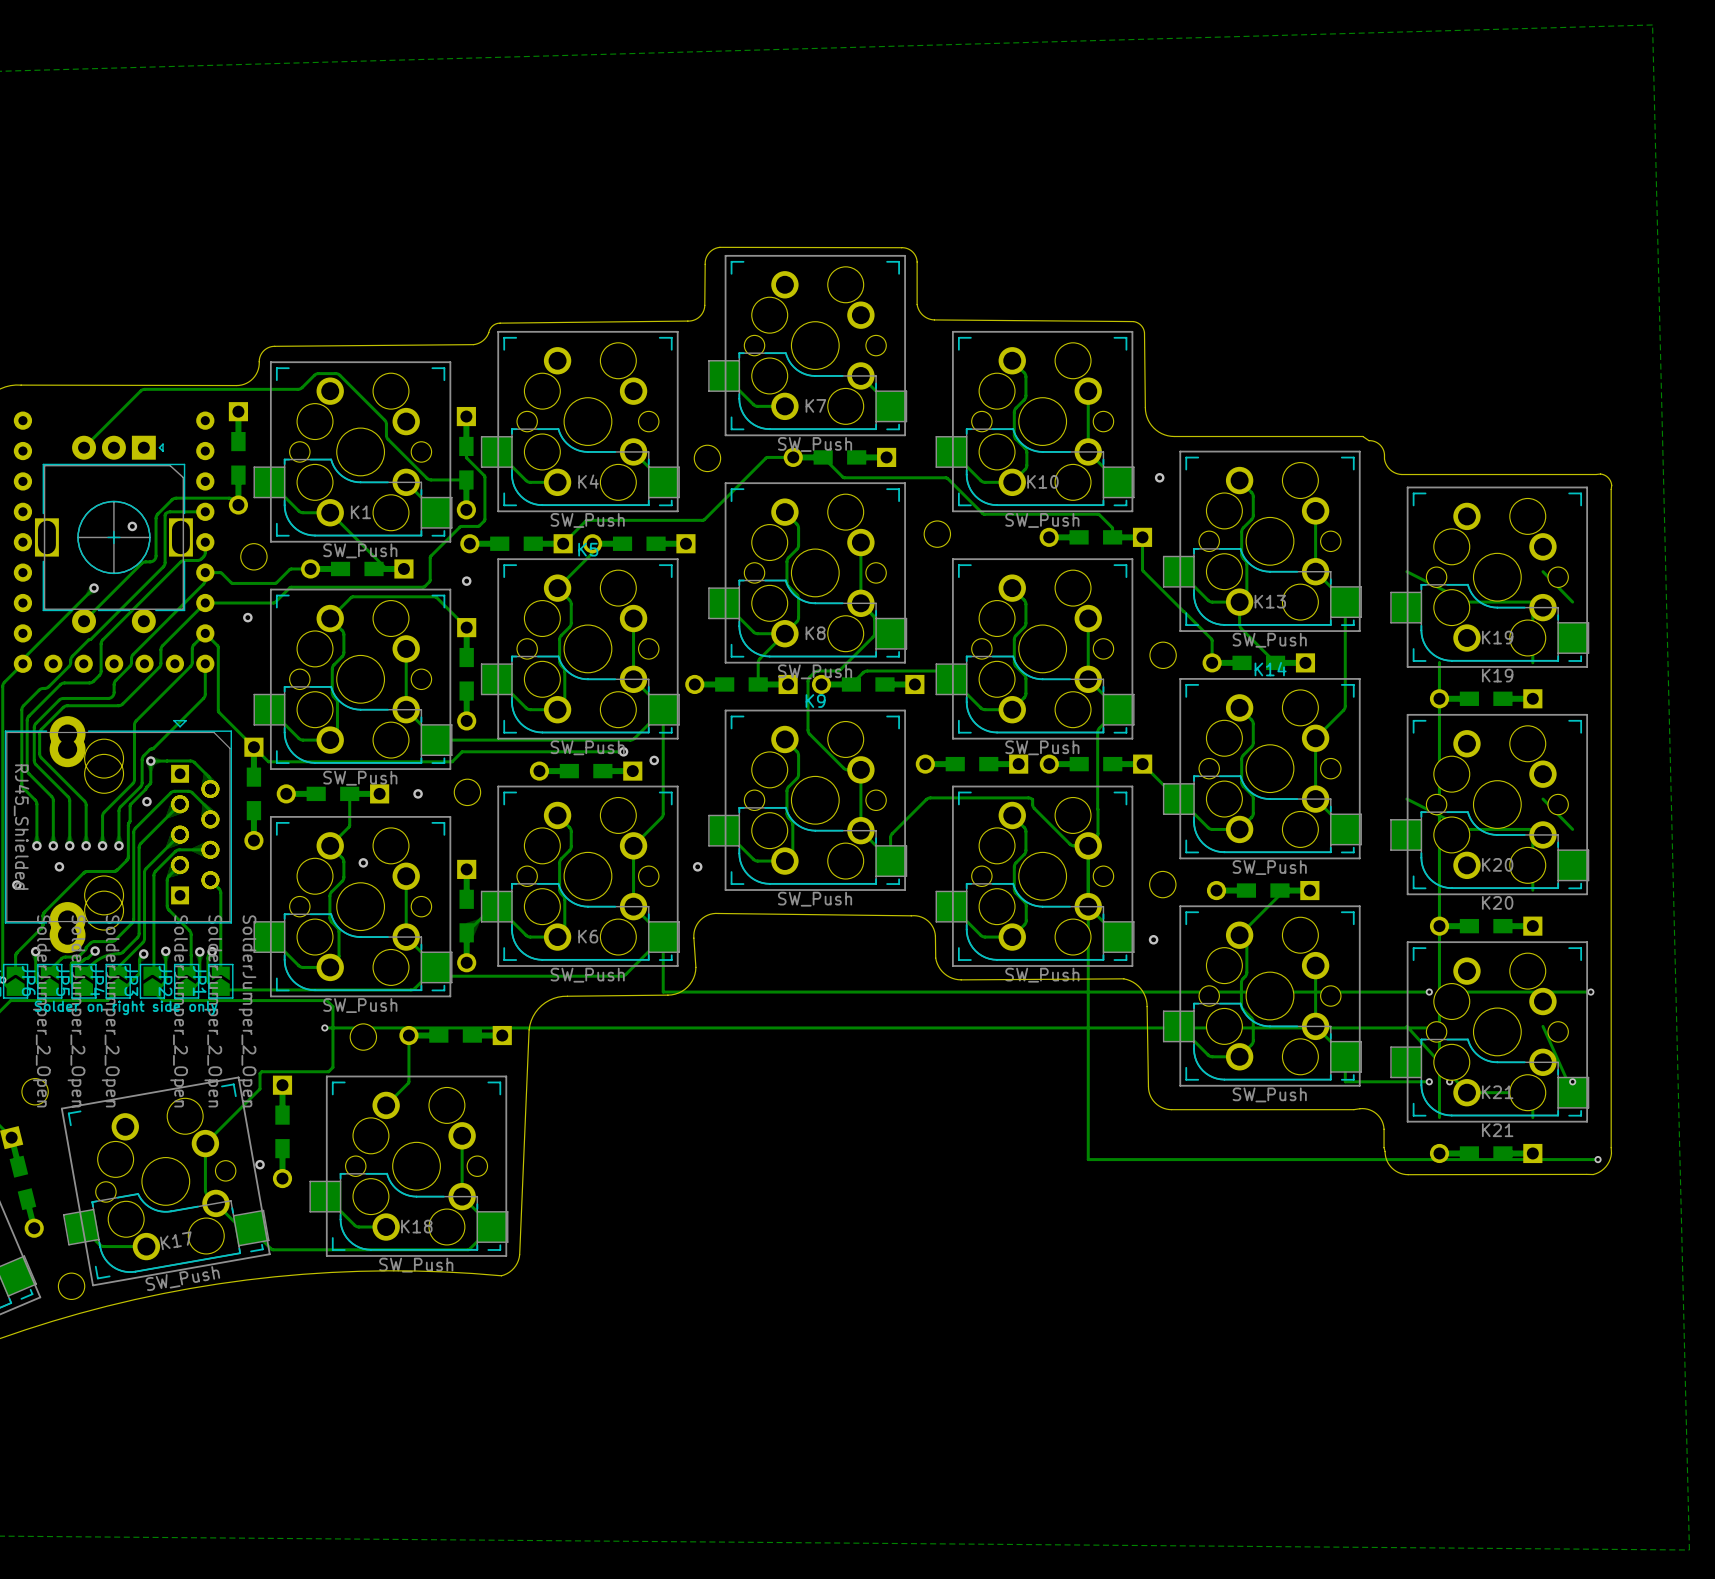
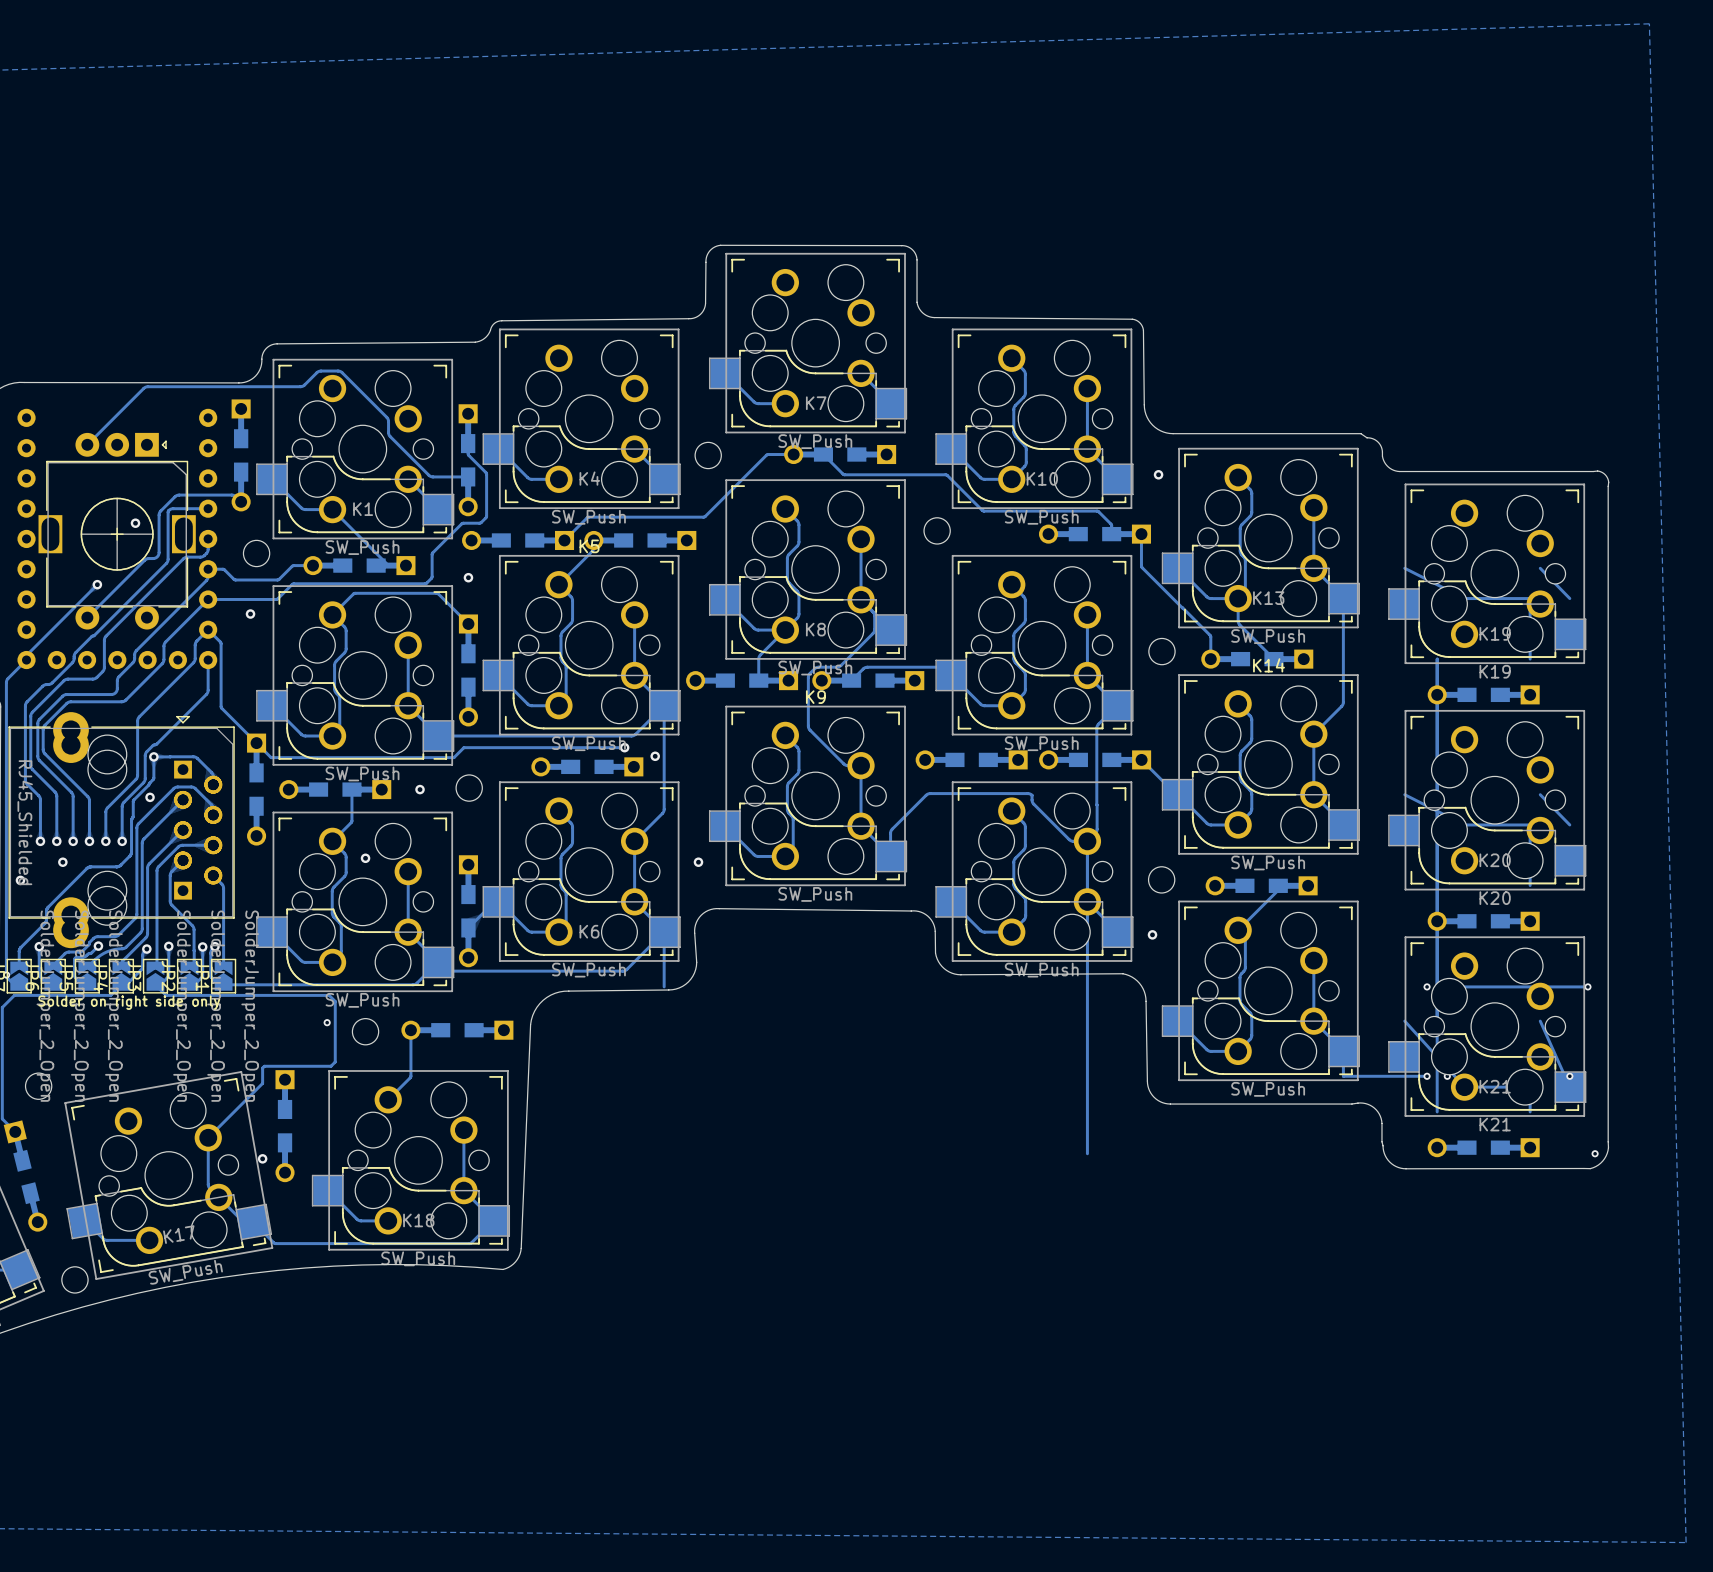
track: (1429, 992) (663, 992) -> none
track: (1439, 1027) (324, 1027) -> none
track: (1598, 1159) (1088, 1159) -> none

